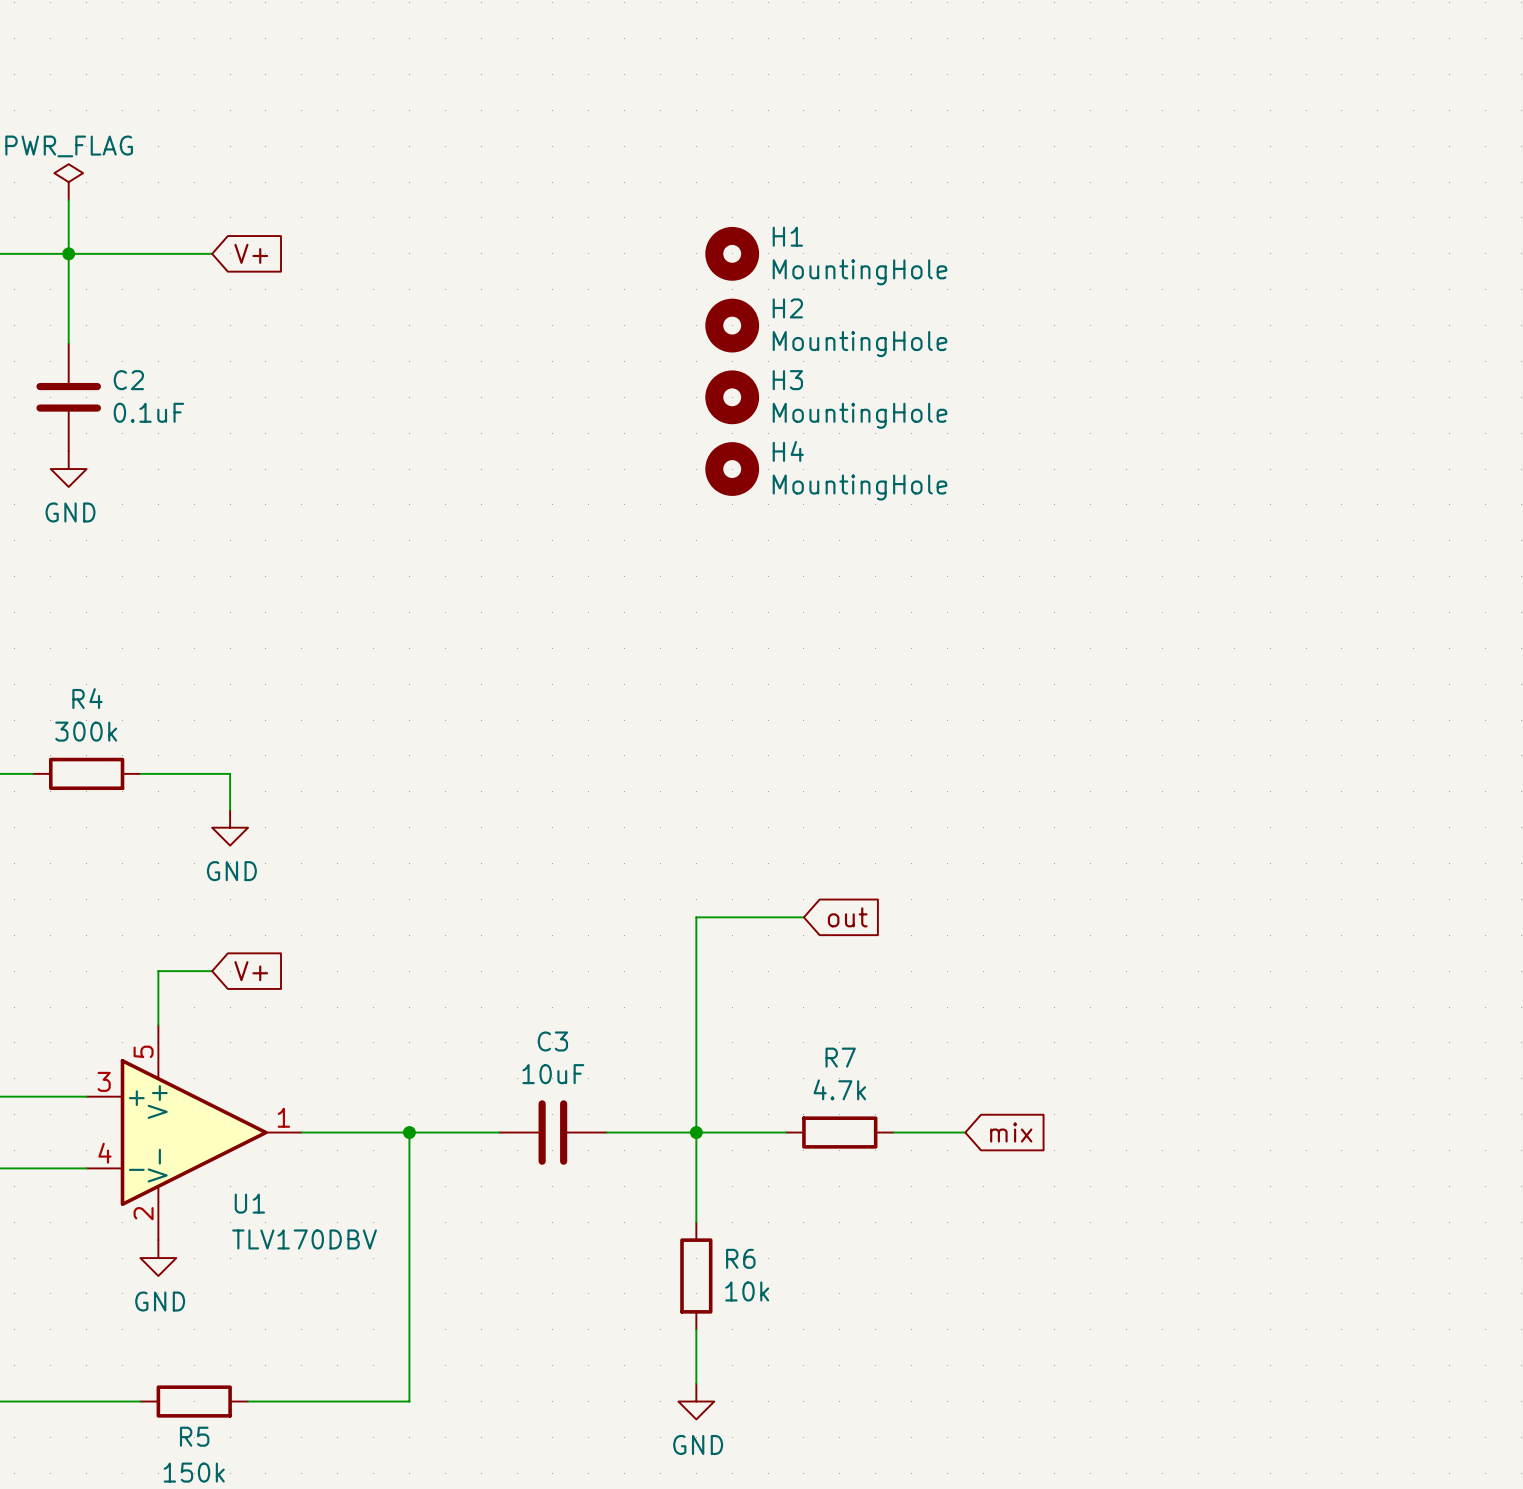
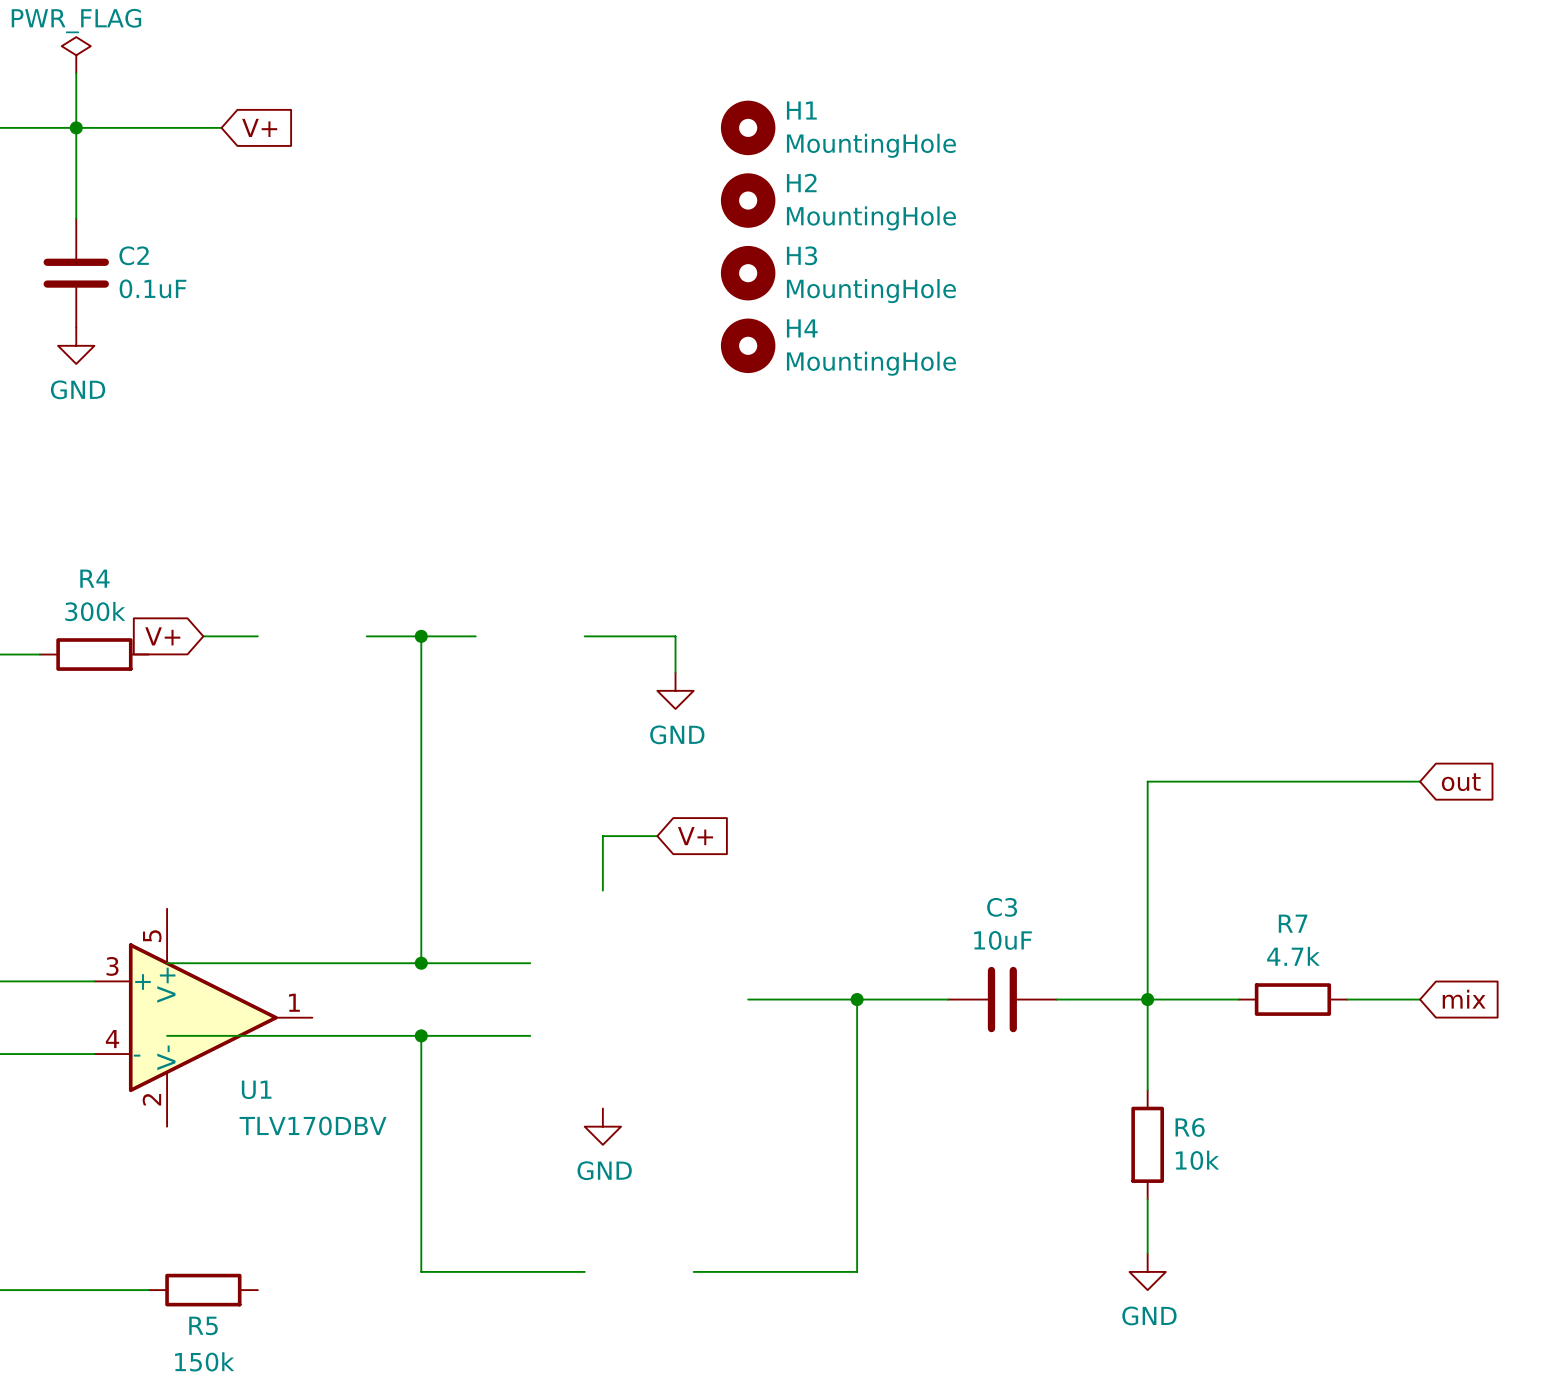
global label: none -> V+ (162, 636)
wire: none -> (203, 636) (257, 636)
wire: none -> (366, 636) (475, 636)
wire: none -> (421, 636) (421, 963)
junction: none -> (421, 636)
wire: none -> (584, 636) (675, 636) (675, 672)
wire: (140, 773) (230, 773) (230, 809) -> none
power symbol: none -> GND (675, 690)
power symbol: GND (230, 827) -> none
wire: none -> (1420, 781) (1147, 781) (1147, 1090)
global label: none -> out (1461, 782)
wire: (803, 917) (696, 917) (696, 1222) -> none
global label: out (847, 917) -> none
wire: none -> (657, 836) (602, 836) (602, 890)
global label: none -> V+ (695, 836)
wire: (212, 971) (158, 971) (158, 1024) -> none
global label: V+ (251, 971) -> none
wire: none -> (167, 963) (530, 963)
junction: none -> (421, 963)
wire: none -> (748, 999) (947, 999)
wire: none -> (857, 999) (857, 1271) (693, 1271)
junction: none -> (857, 999)
wire: none -> (1056, 999) (1238, 999)
junction: none -> (1147, 999)
wire: none -> (1347, 999) (1420, 999)
global label: none -> mix (1464, 999)
wire: (301, 1132) (499, 1132) -> none
wire: (409, 1132) (409, 1150) -> none
junction position: (409, 1132) -> (421, 1035)
C3 position: (552, 1132) -> (1002, 999)
wire: (606, 1132) (786, 1132) -> none
junction: (696, 1132) -> none
R7 position: (839, 1132) -> (1292, 999)
wire: (893, 1132) (965, 1132) -> none
global label: mix (1011, 1132) -> none
wire: none -> (167, 1035) (530, 1035)
power symbol: GND (158, 1258) -> none
R6 position: (696, 1276) -> (1147, 1144)
wire: none -> (1147, 1199) (1147, 1253)
wire: (696, 1329) (696, 1383) -> none
wire: (409, 1383) (409, 1401) (248, 1401) -> (421, 1271) (584, 1271)
power symbol: none -> GND (1147, 1271)
power symbol position: GND (696, 1401) -> GND (602, 1126)

